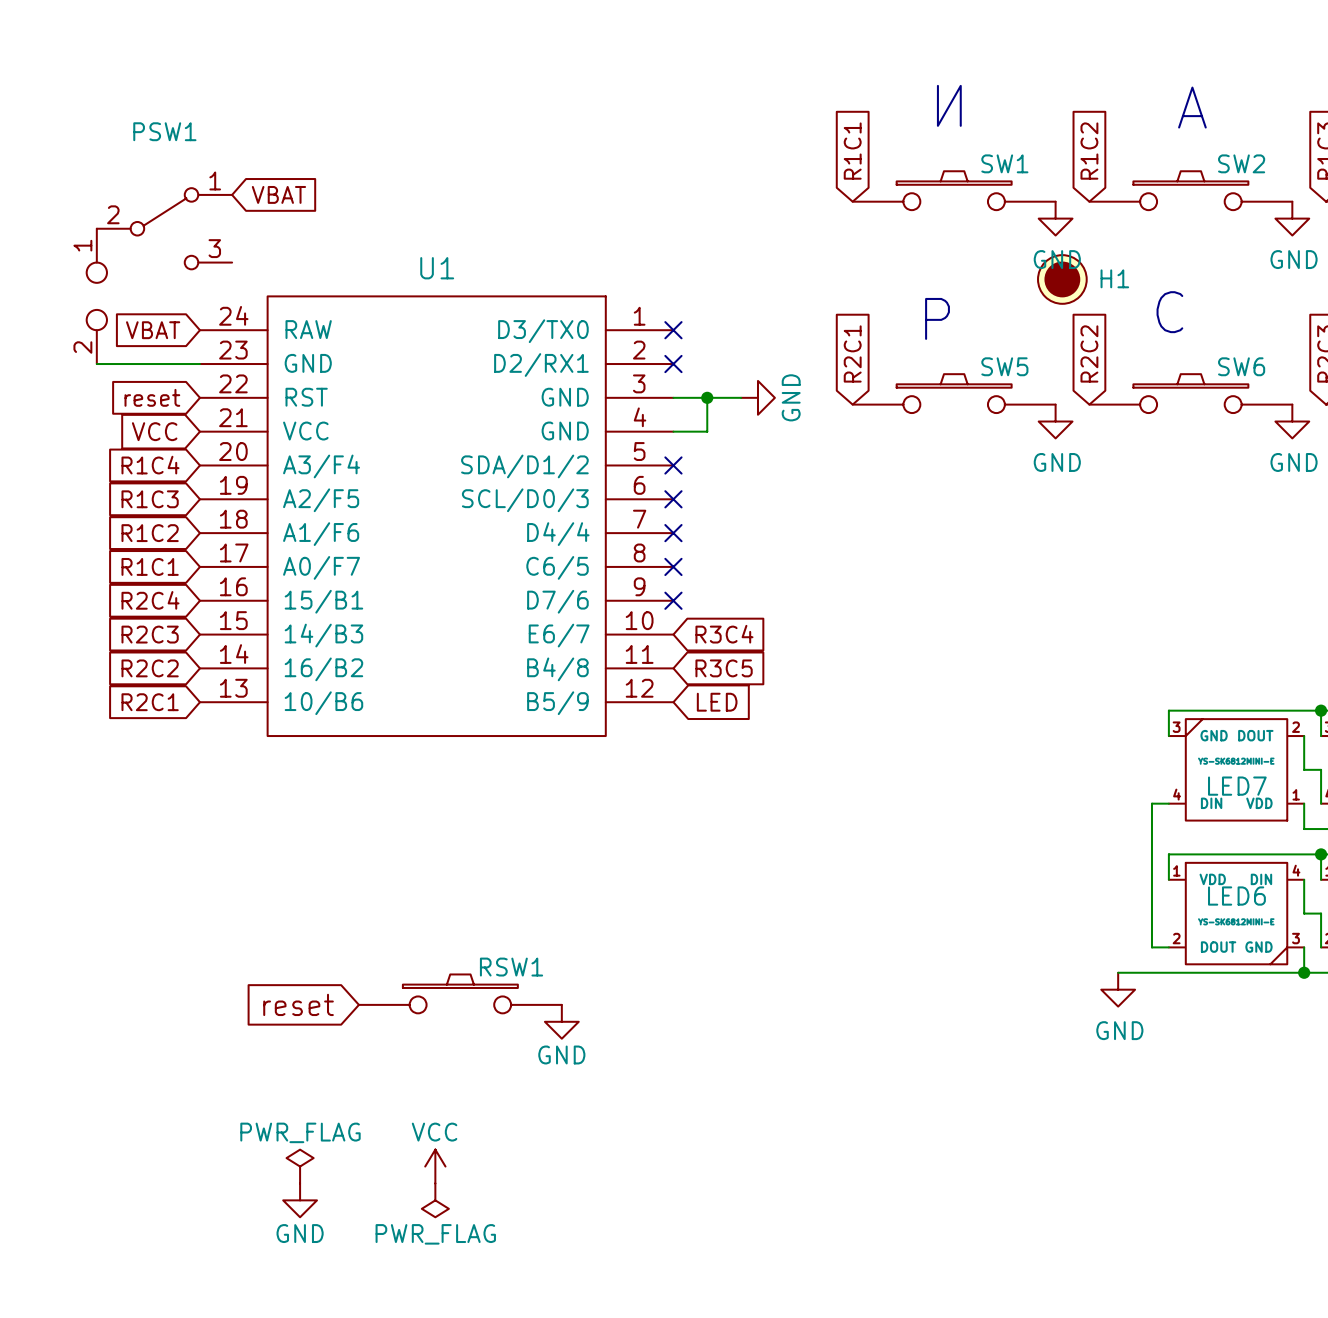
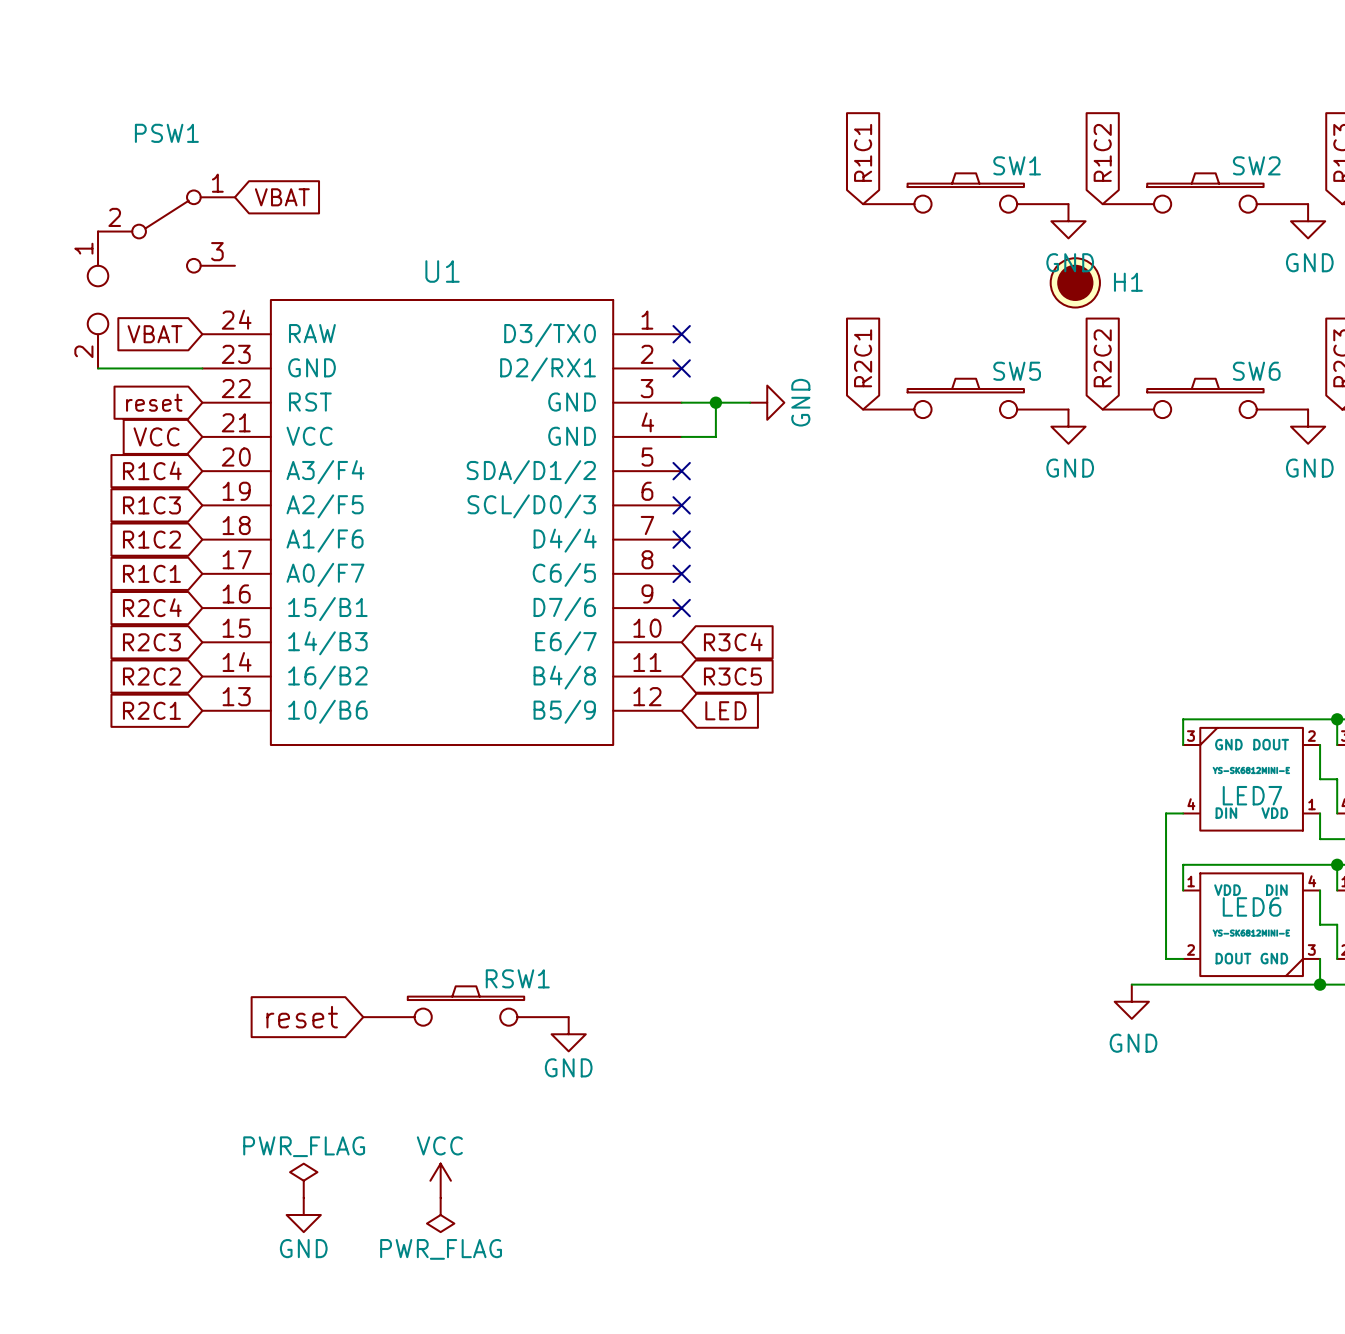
text: И (949, 105) -> none
text: А (1192, 107) -> none
text: С (1169, 312) -> none
text: Р (937, 318) -> none

